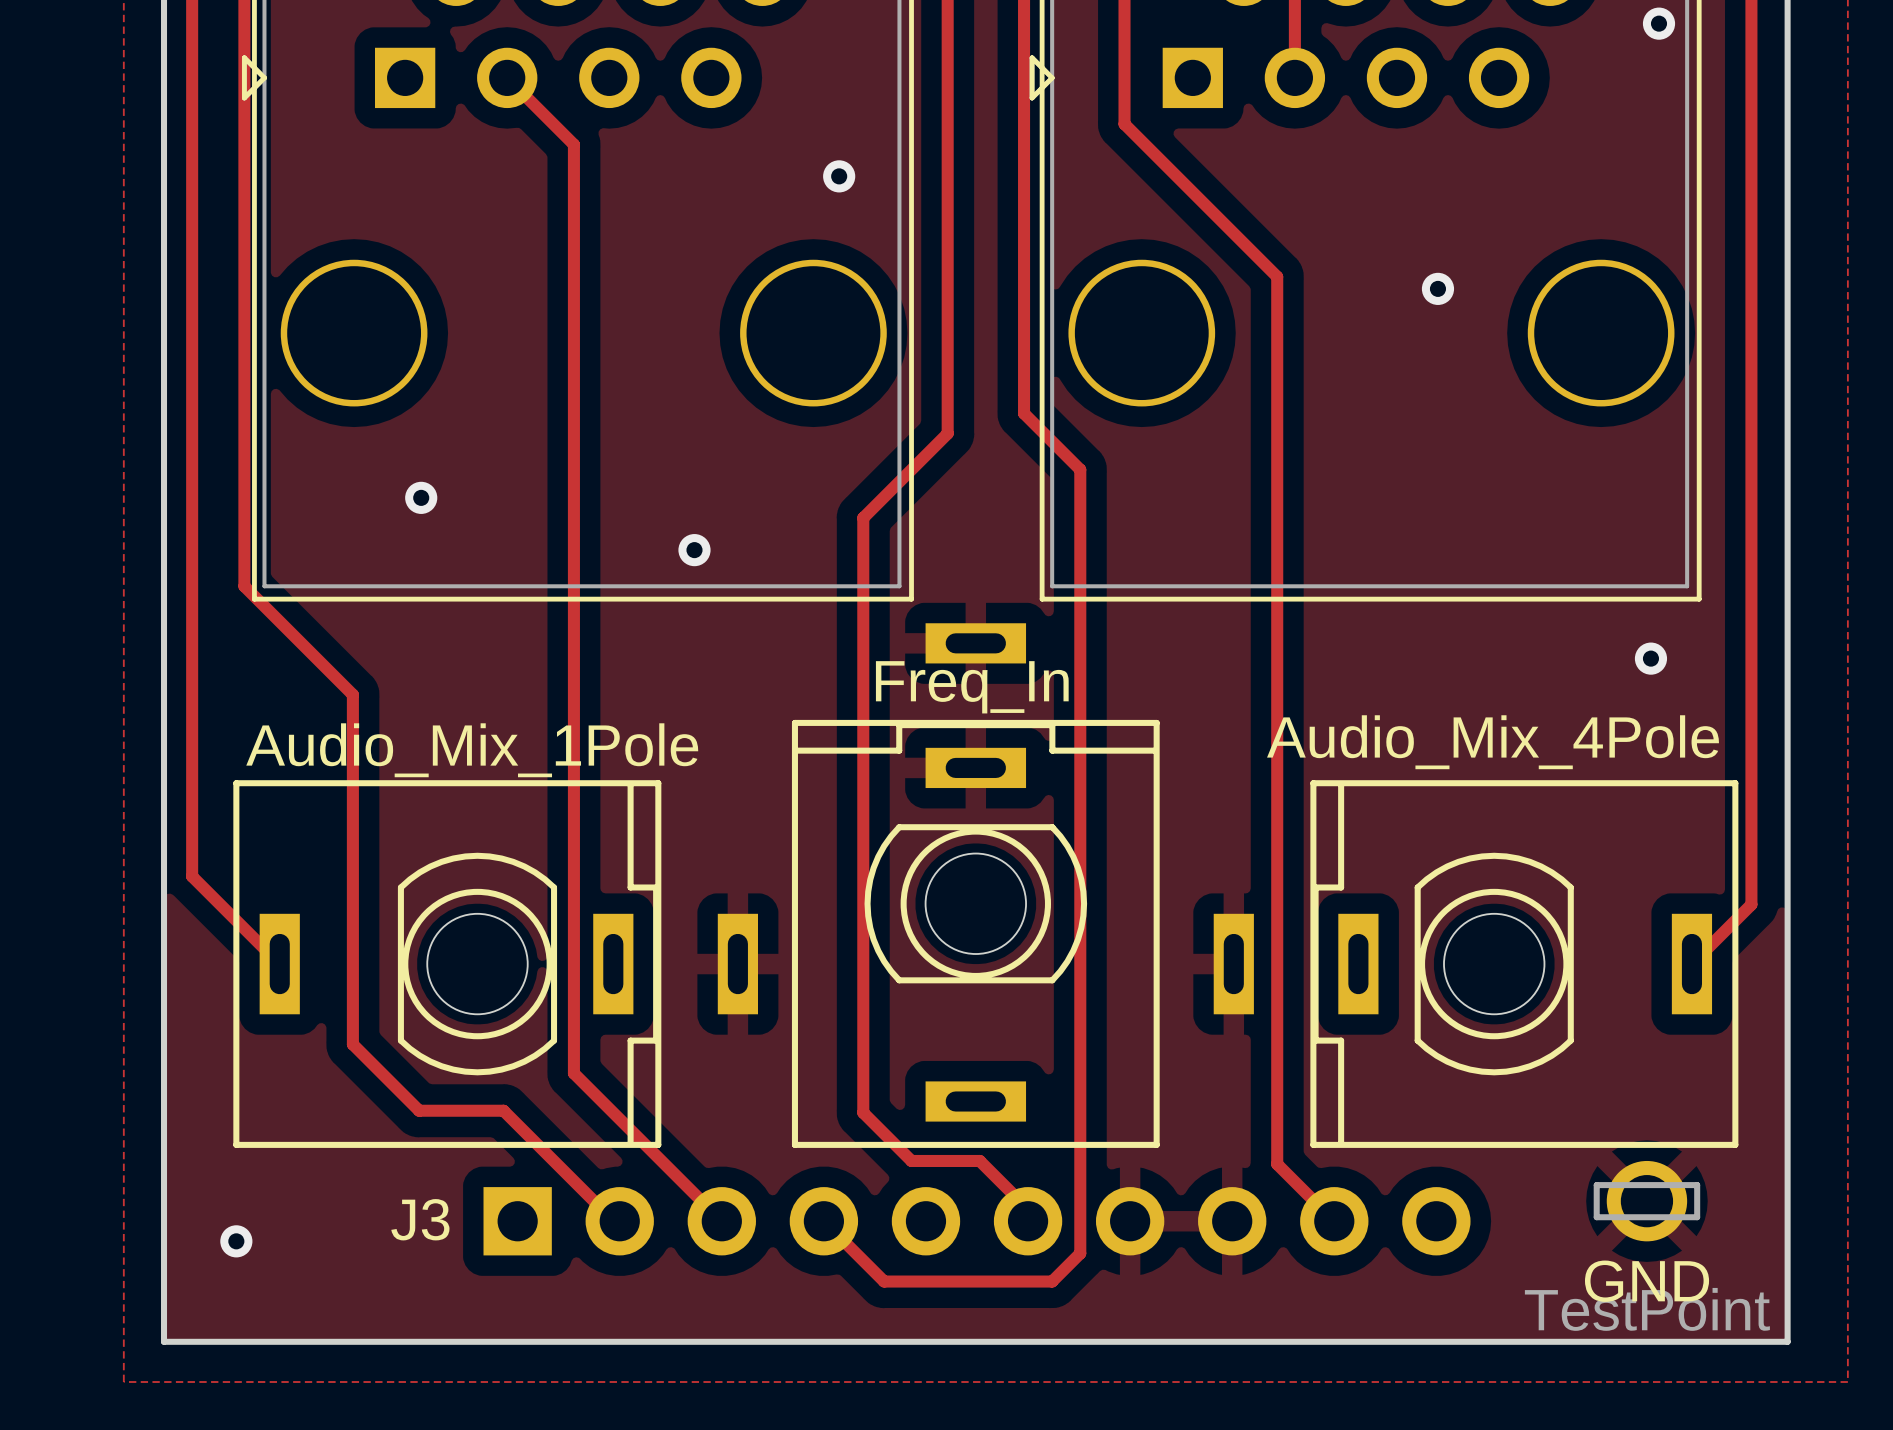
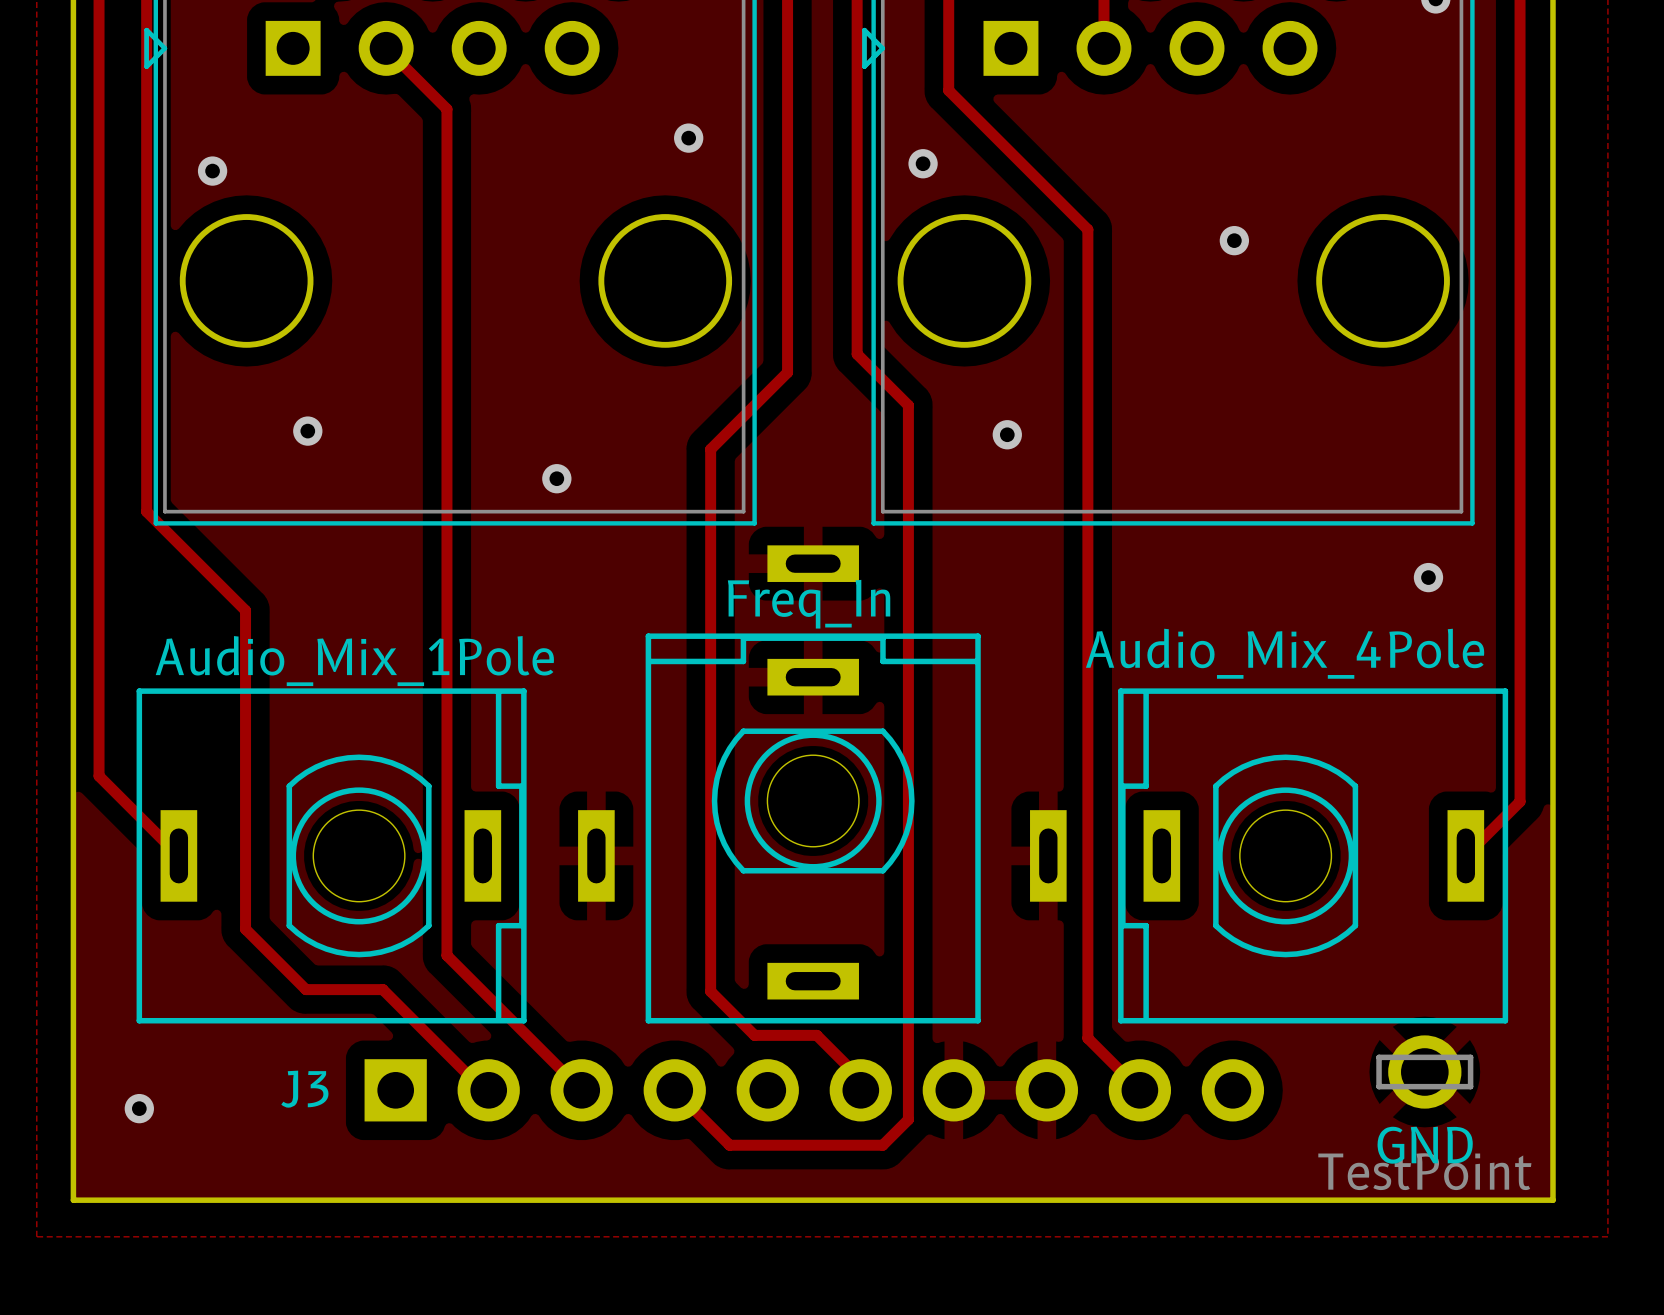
via: none -> (923, 163)
via: none -> (212, 171)
via: none -> (1007, 434)

